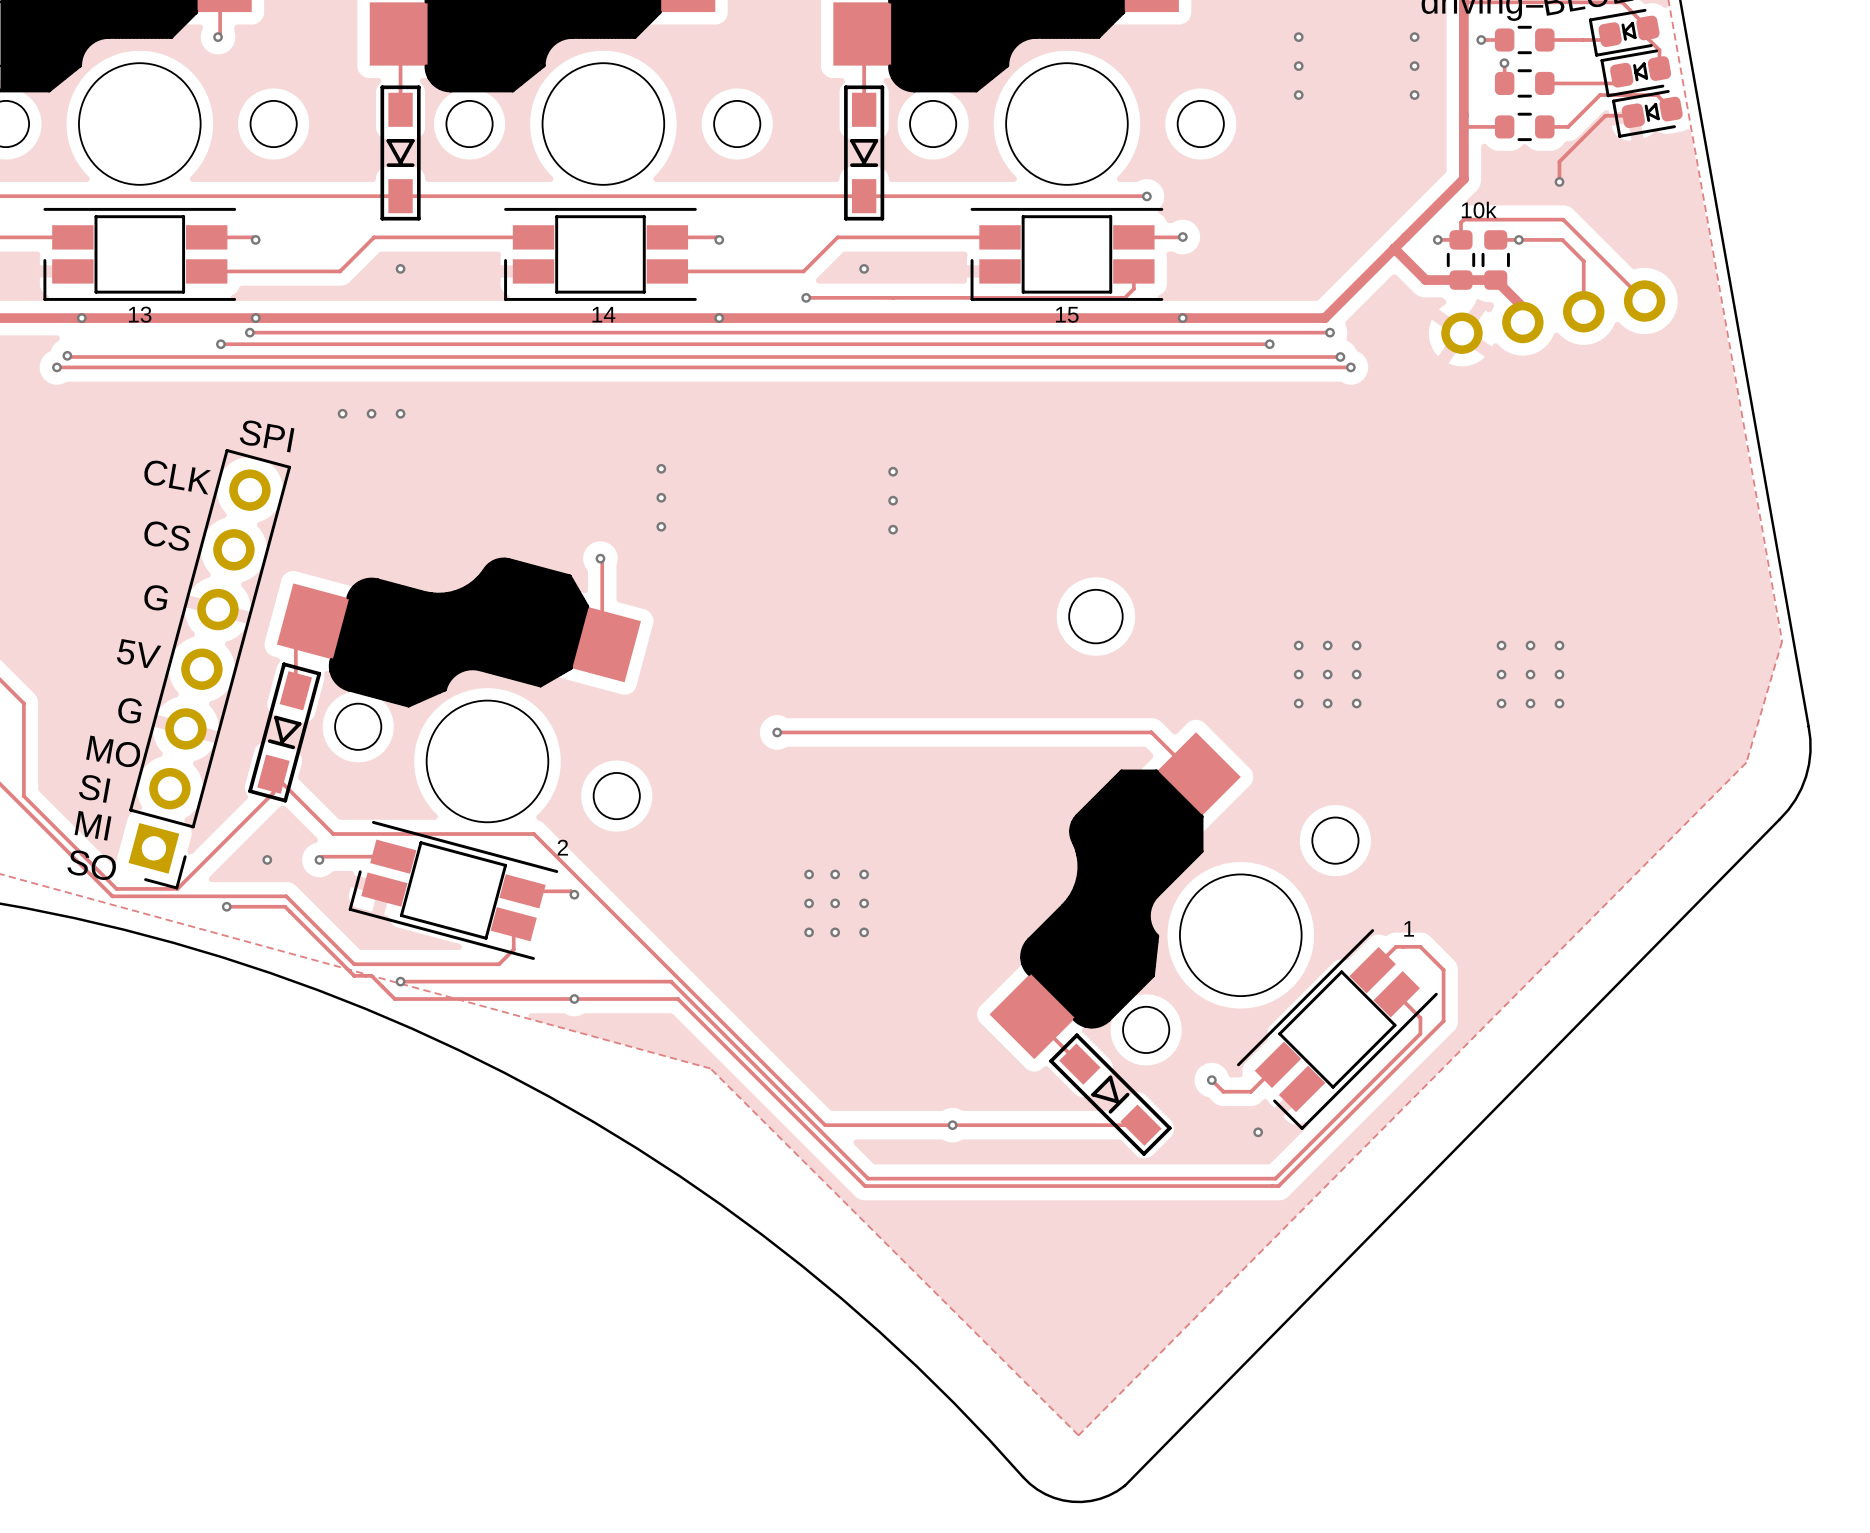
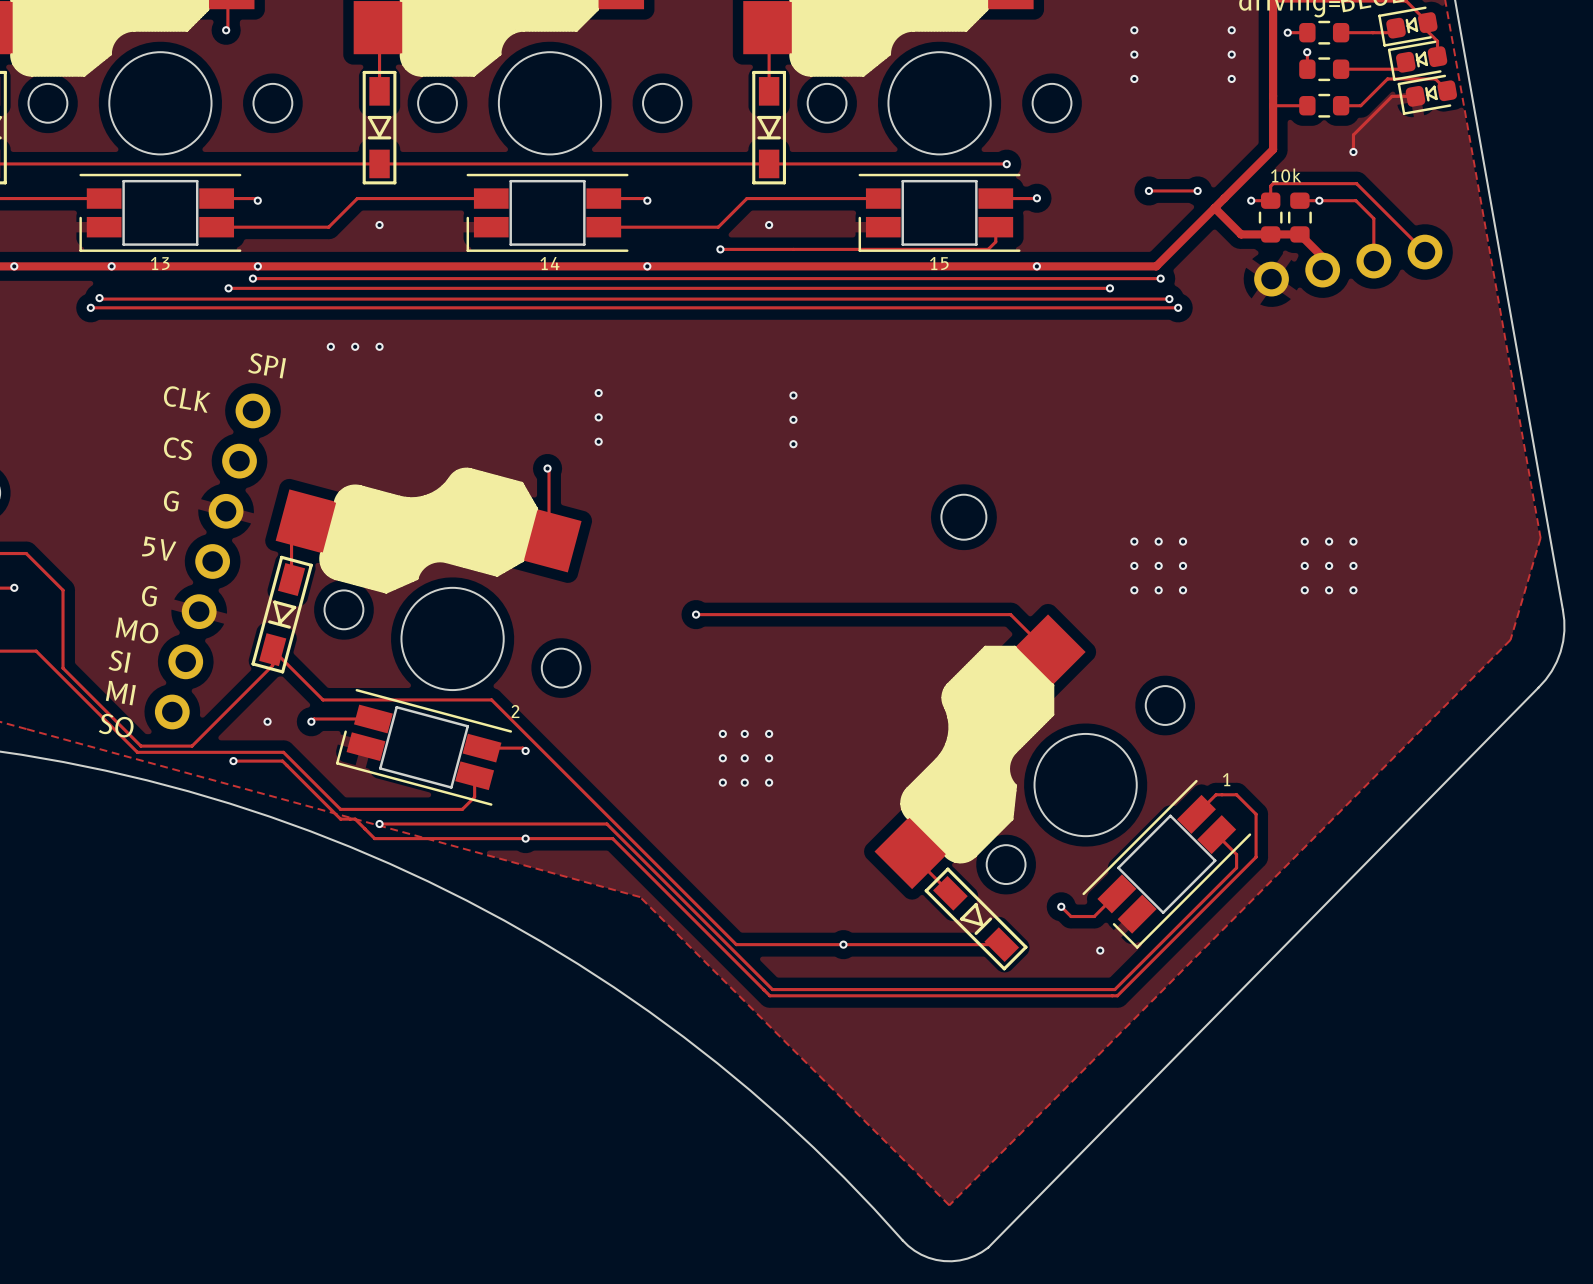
track: none -> (1148, 190) (1197, 190)
via: none -> (1148, 190)
via: none -> (1197, 190)
part footprint: [128, 449, 292, 890] -> [154, 393, 271, 730]

